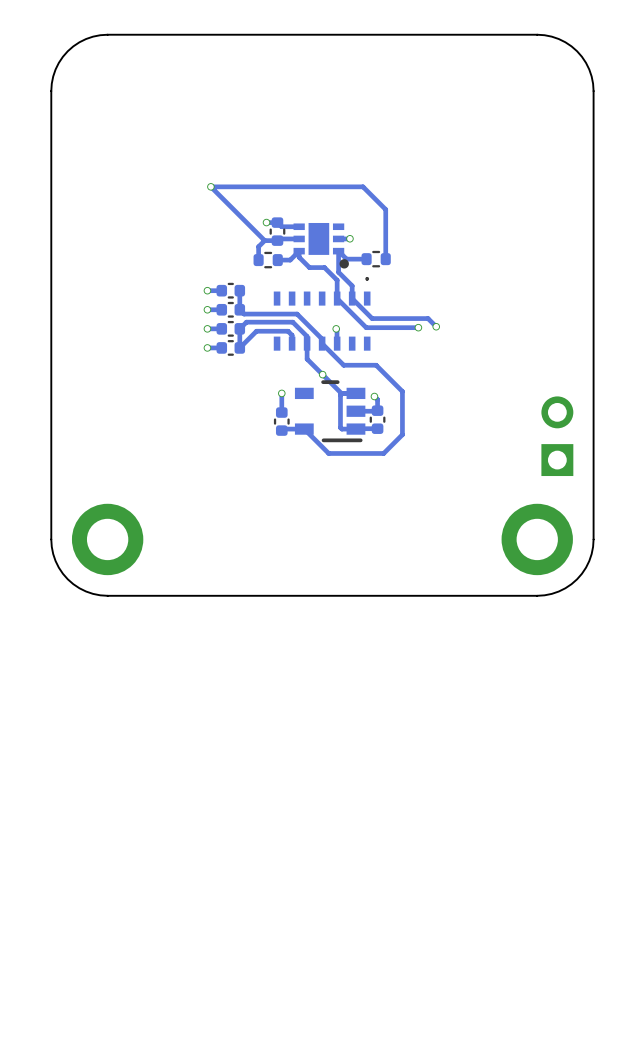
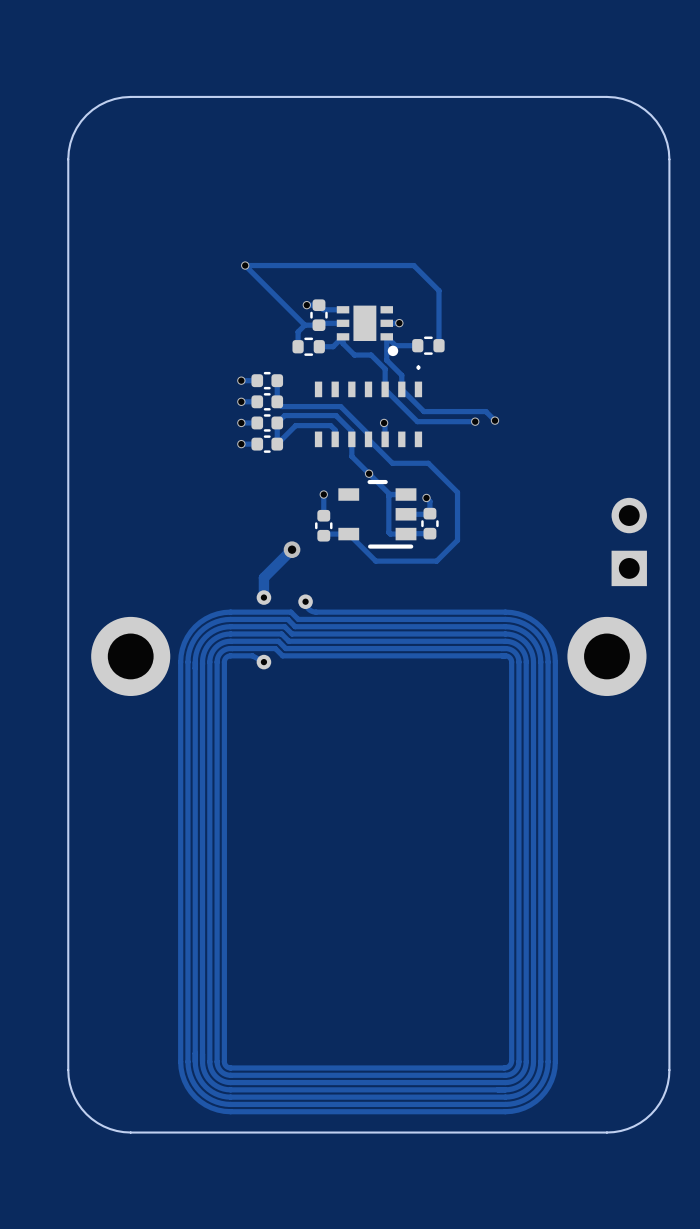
track: none -> (292, 549) (263, 577) (263, 597)
via: none -> (292, 549)
board edge: (593, 539) (589, 561) (577, 579) (558, 591) (537, 595) (100, 595) (79, 588) (62, 573) (53, 554) (51, 539) -> (669, 656) (669, 1077) (663, 1097) (651, 1114) (634, 1126) (620, 1130) (606, 1132) (130, 1132) (110, 1129) (91, 1118) (81, 1109) (74, 1097) (69, 1083) (68, 1070) (68, 656)
part: none -> (368, 852)

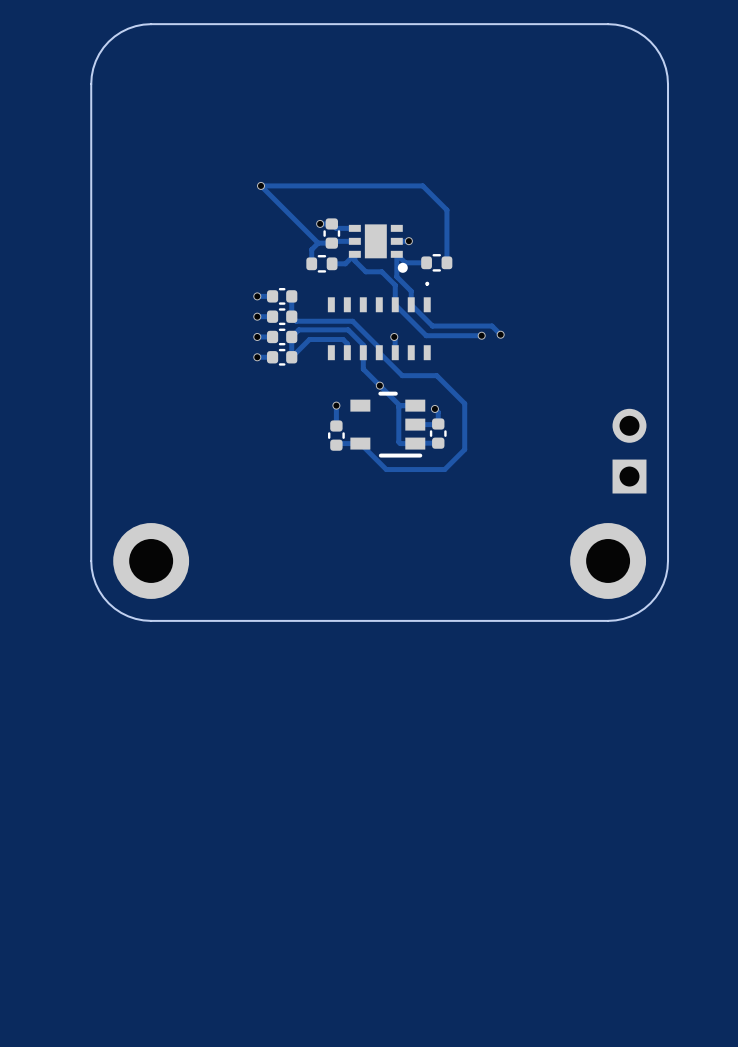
track: (292, 549) (263, 577) (263, 597) -> none
via: (292, 549) -> none
board edge: (669, 656) (669, 1077) (663, 1097) (651, 1114) (634, 1126) (620, 1130) (606, 1132) (130, 1132) (110, 1129) (91, 1118) (81, 1109) (74, 1097) (69, 1083) (68, 1070) (68, 656) -> (668, 560) (663, 583) (650, 603) (631, 616) (608, 620) (143, 620) (121, 612) (103, 597) (93, 576) (91, 560)
part: (368, 852) -> none

